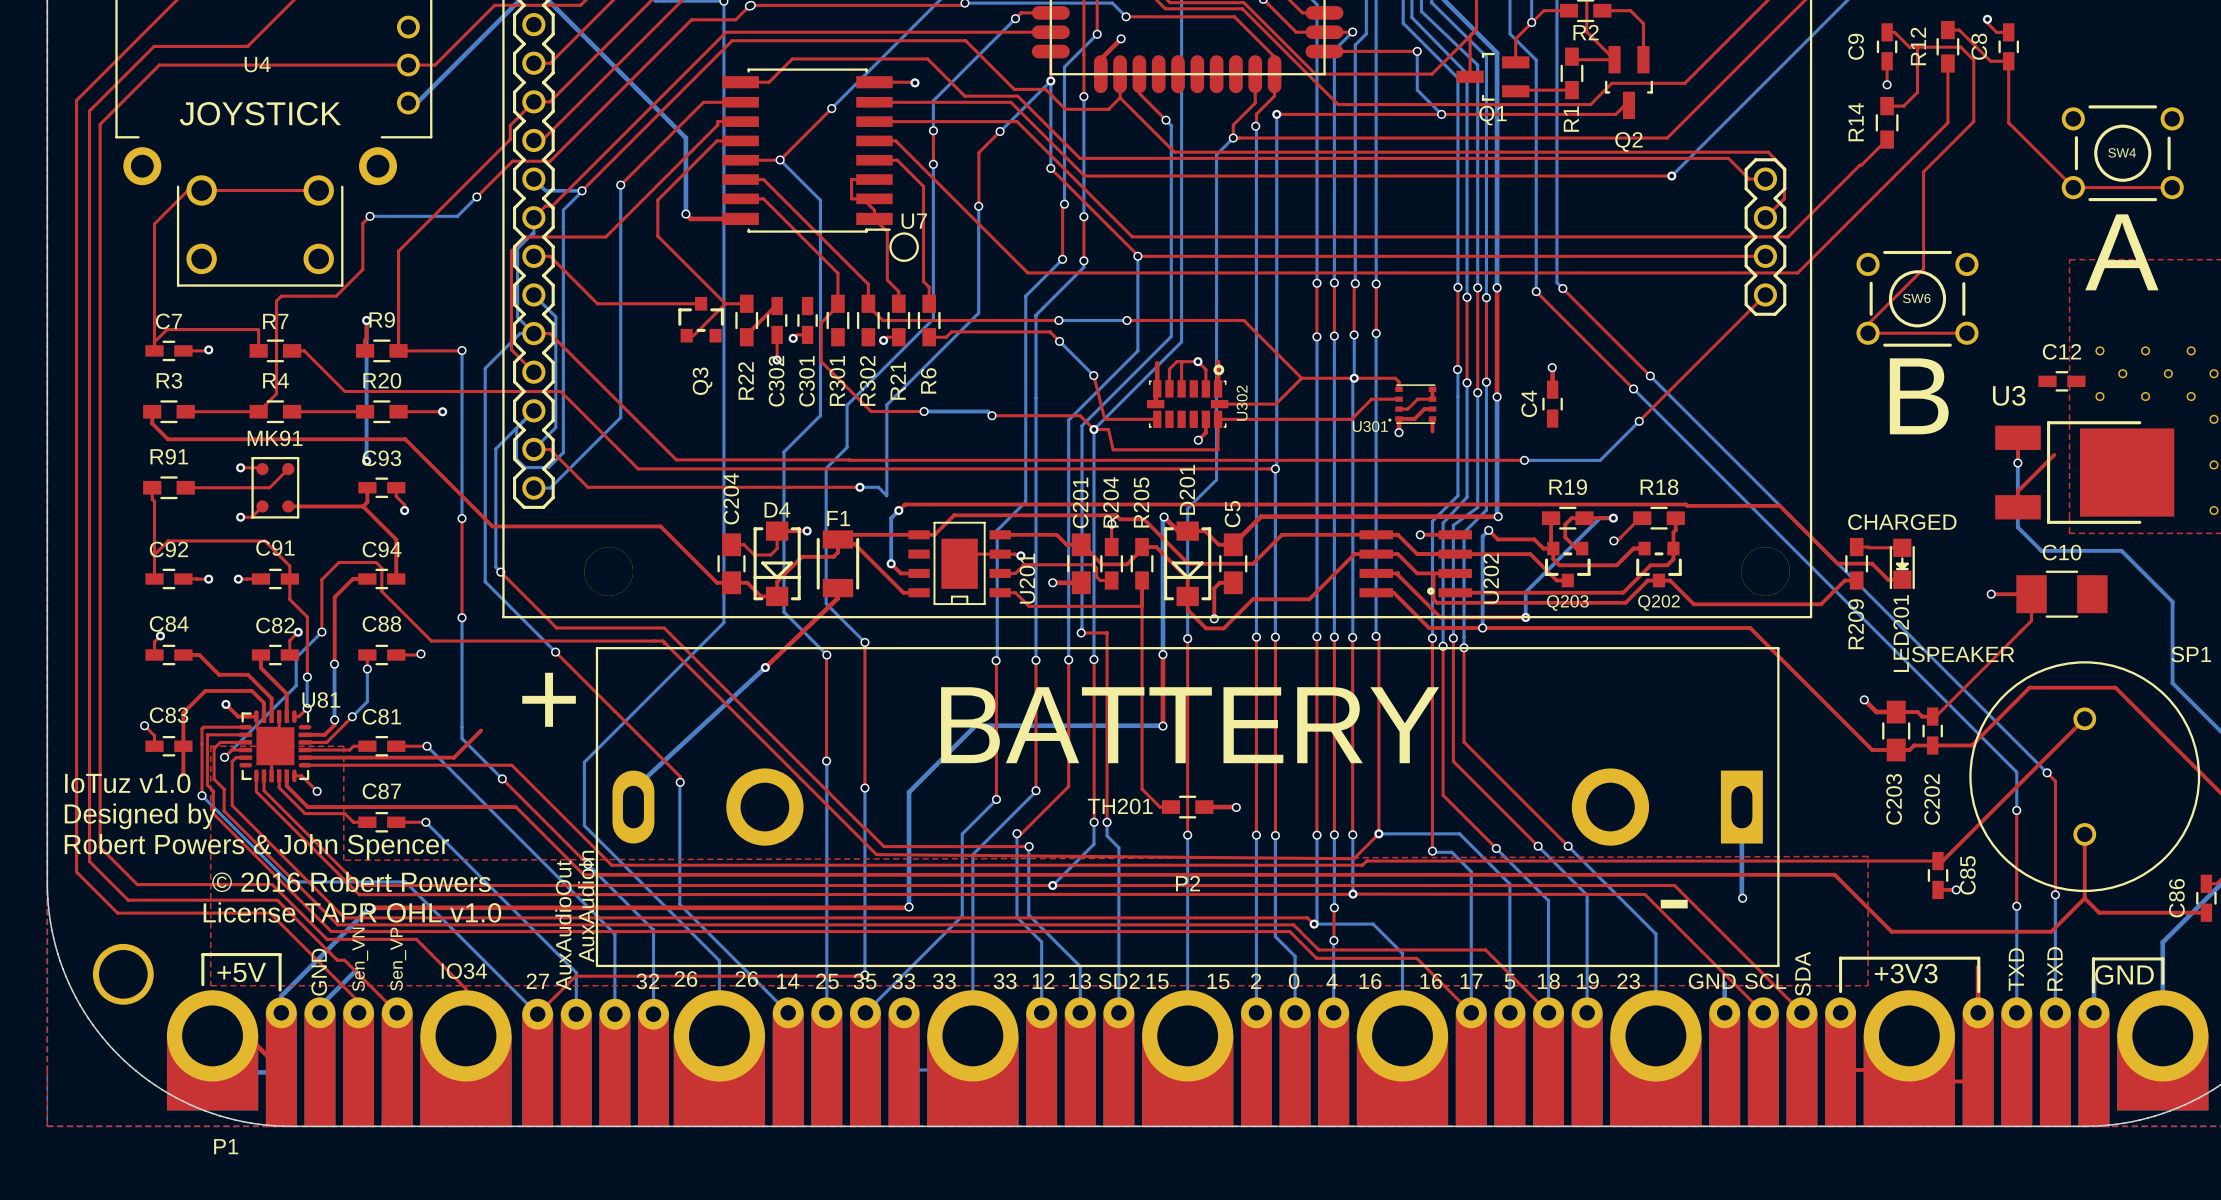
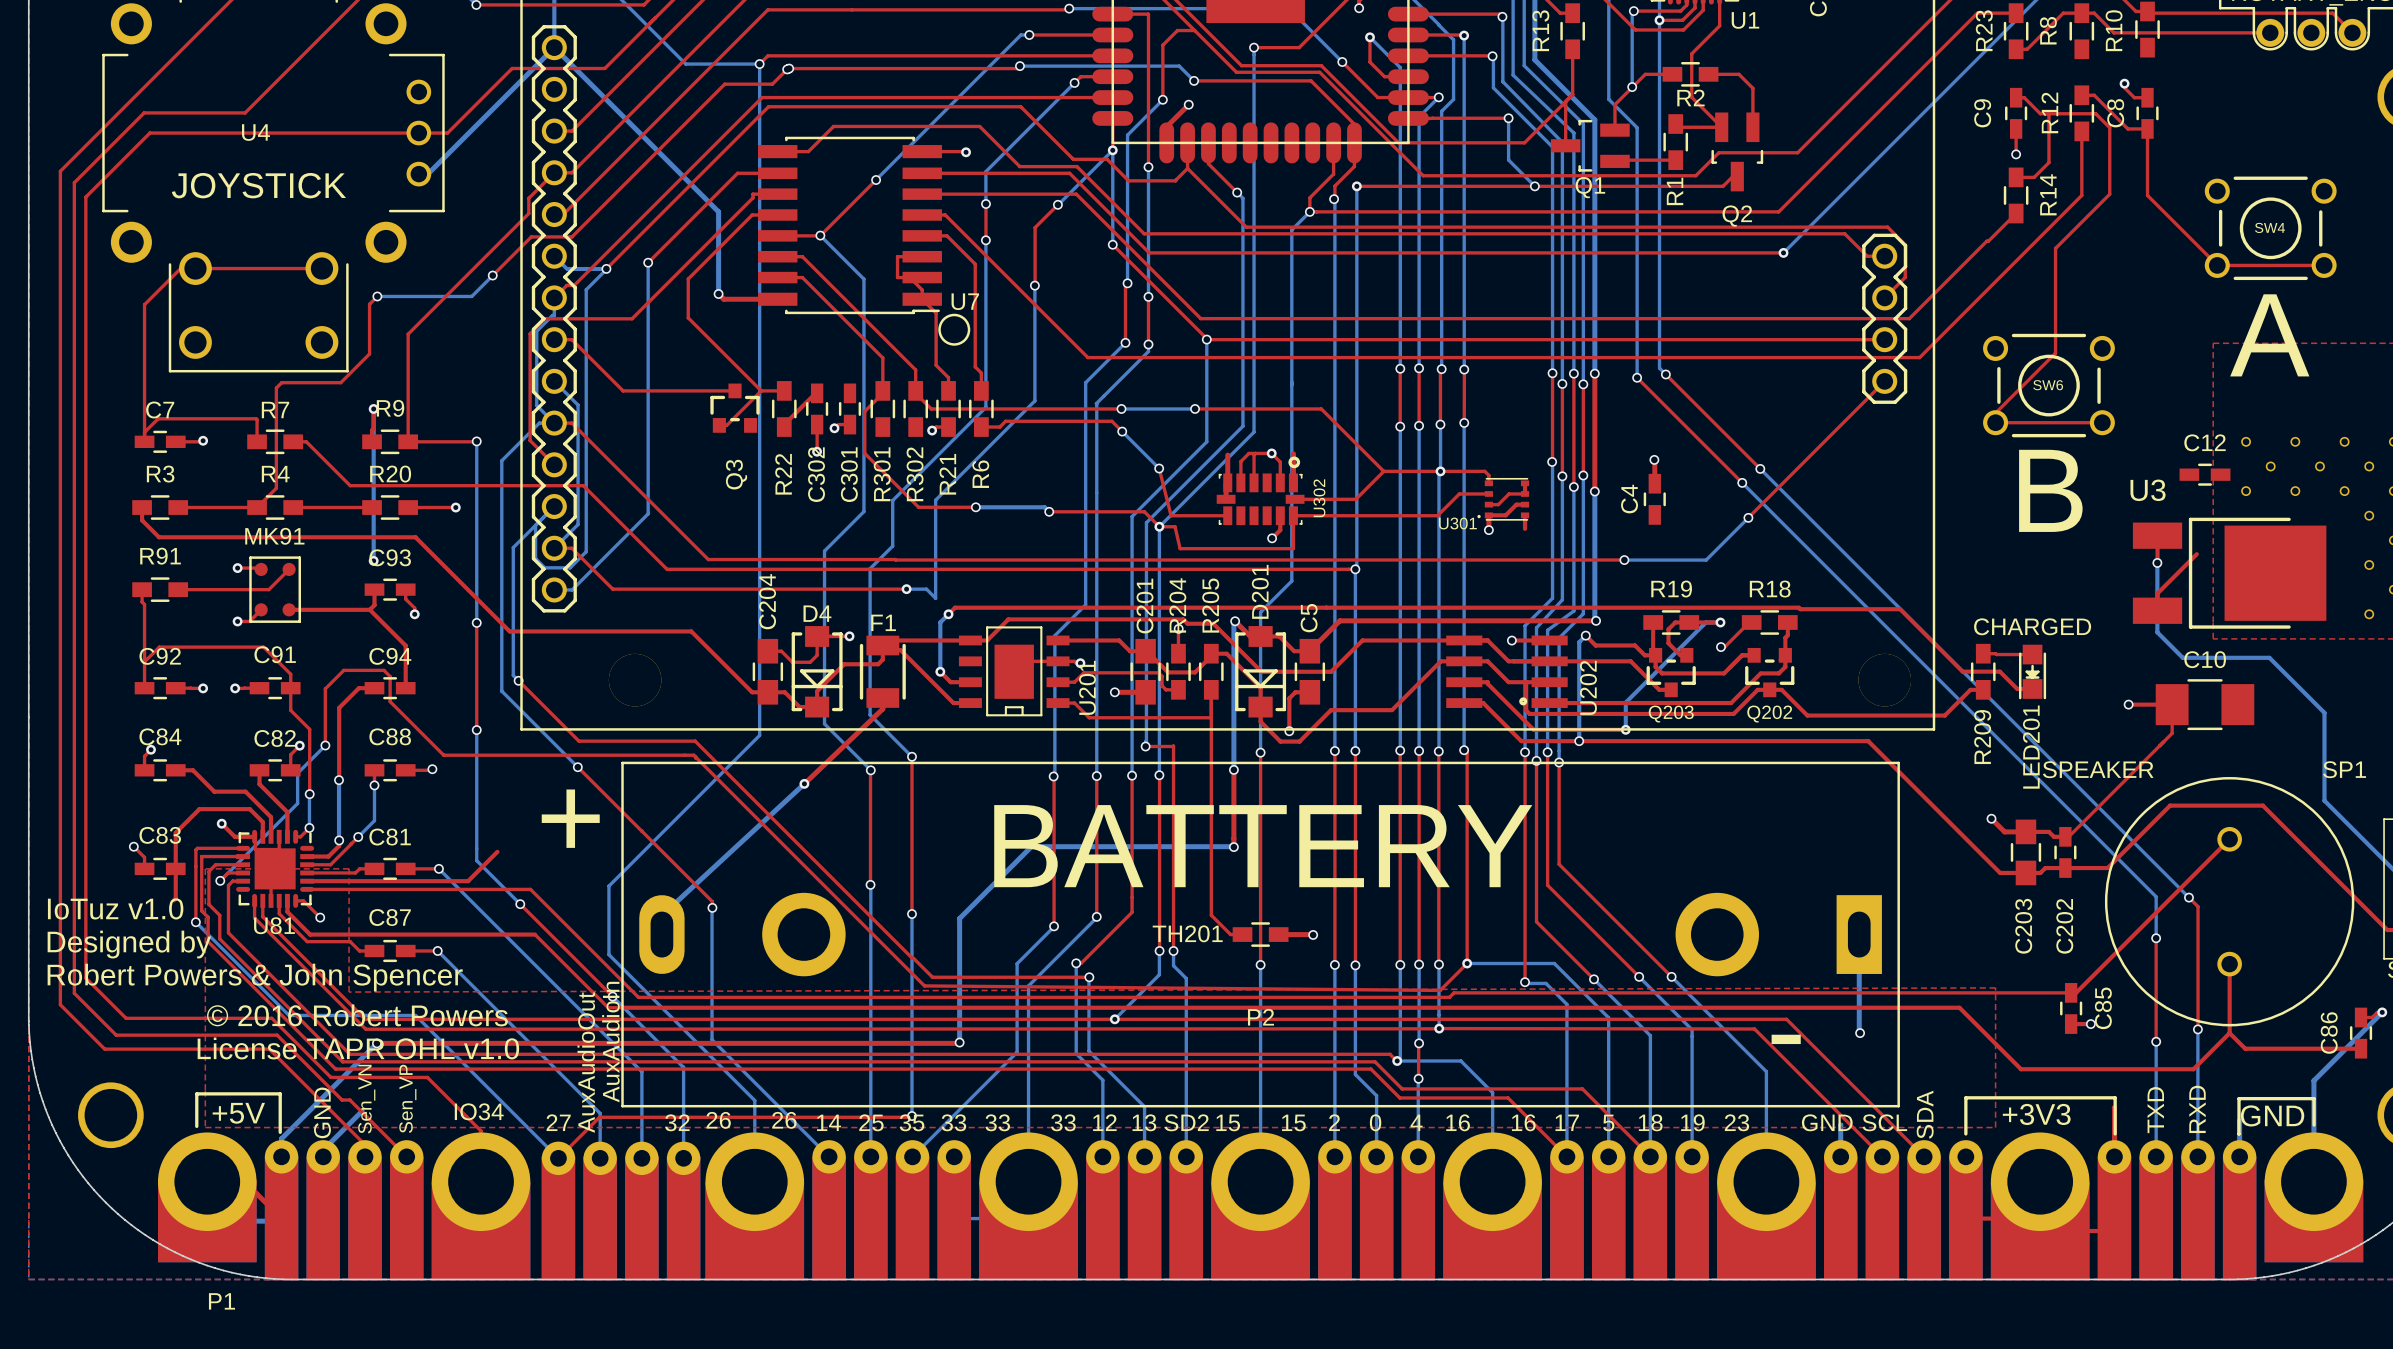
R14 name position: R14 (1856, 122) -> R14 (2048, 194)
U81 name position: U81 (321, 700) -> U81 (274, 925)

